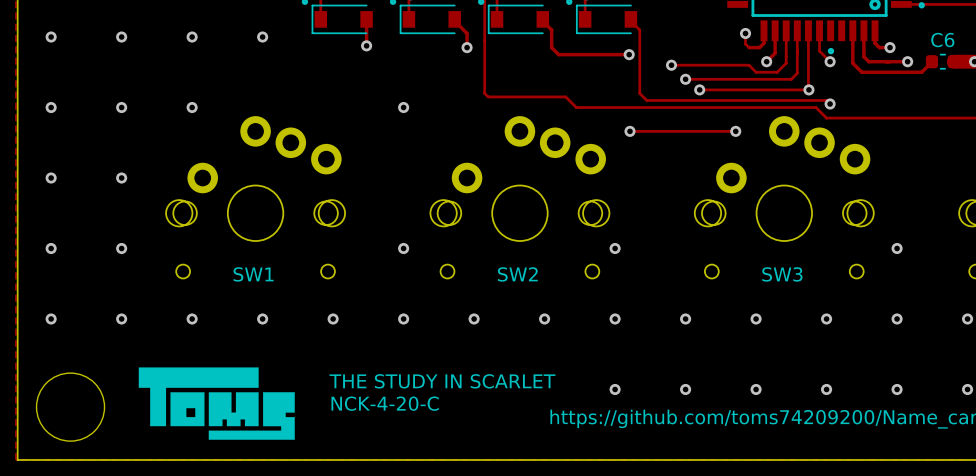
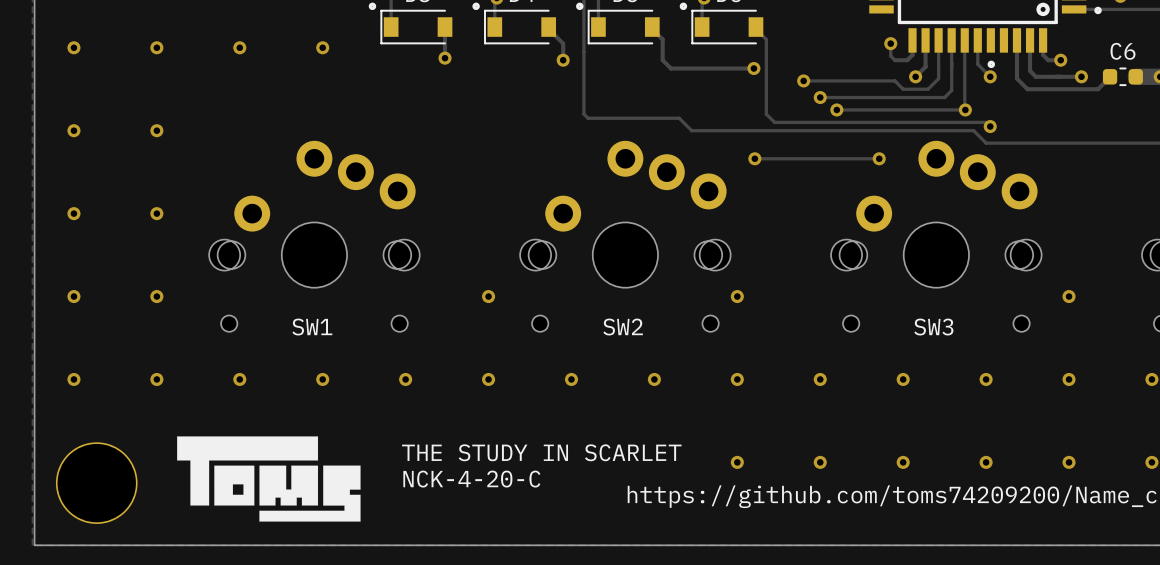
via: (192, 107) -> none
via: (403, 107) -> none

